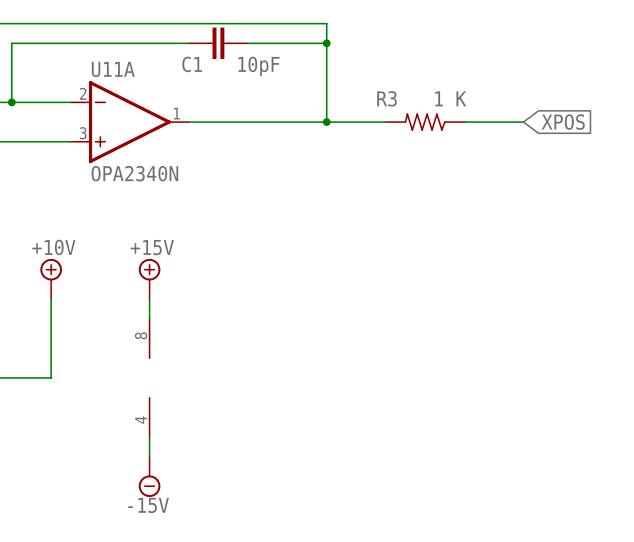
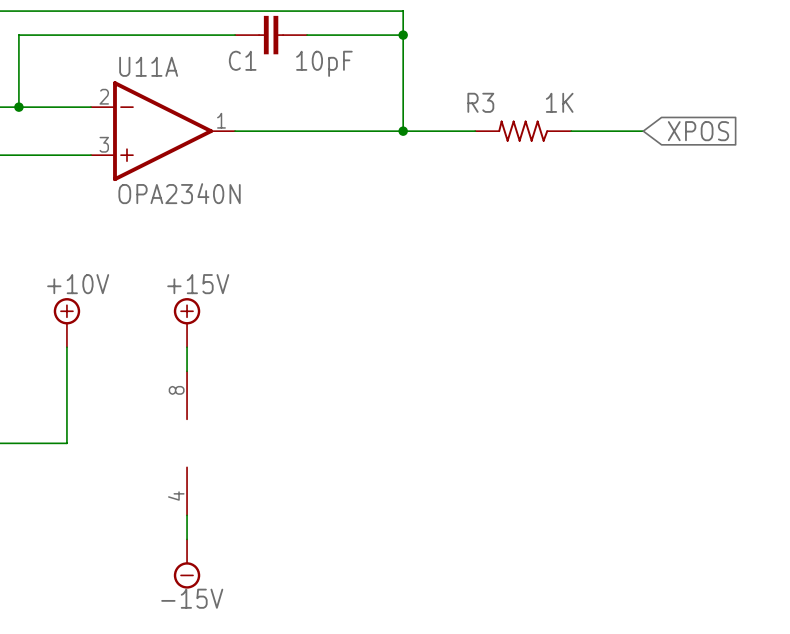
R3 value: 1 K (450, 98) -> 1K (559, 102)

